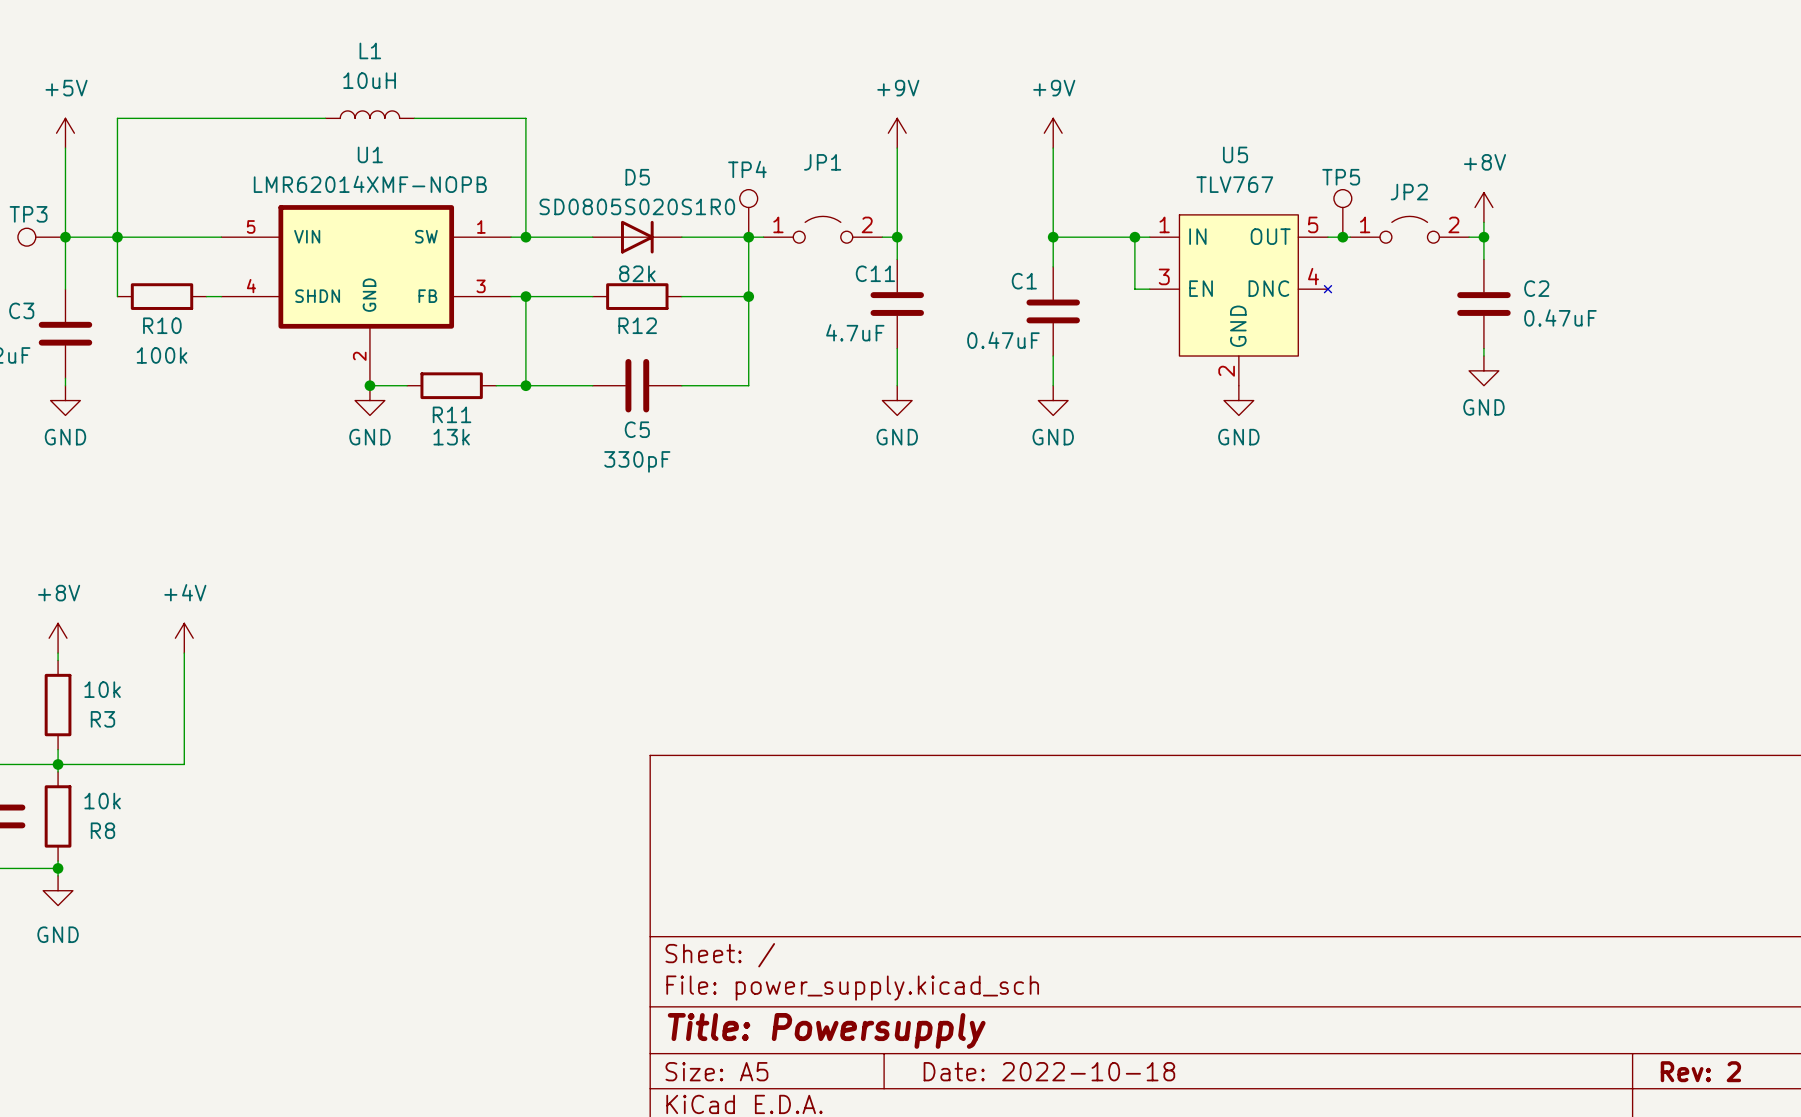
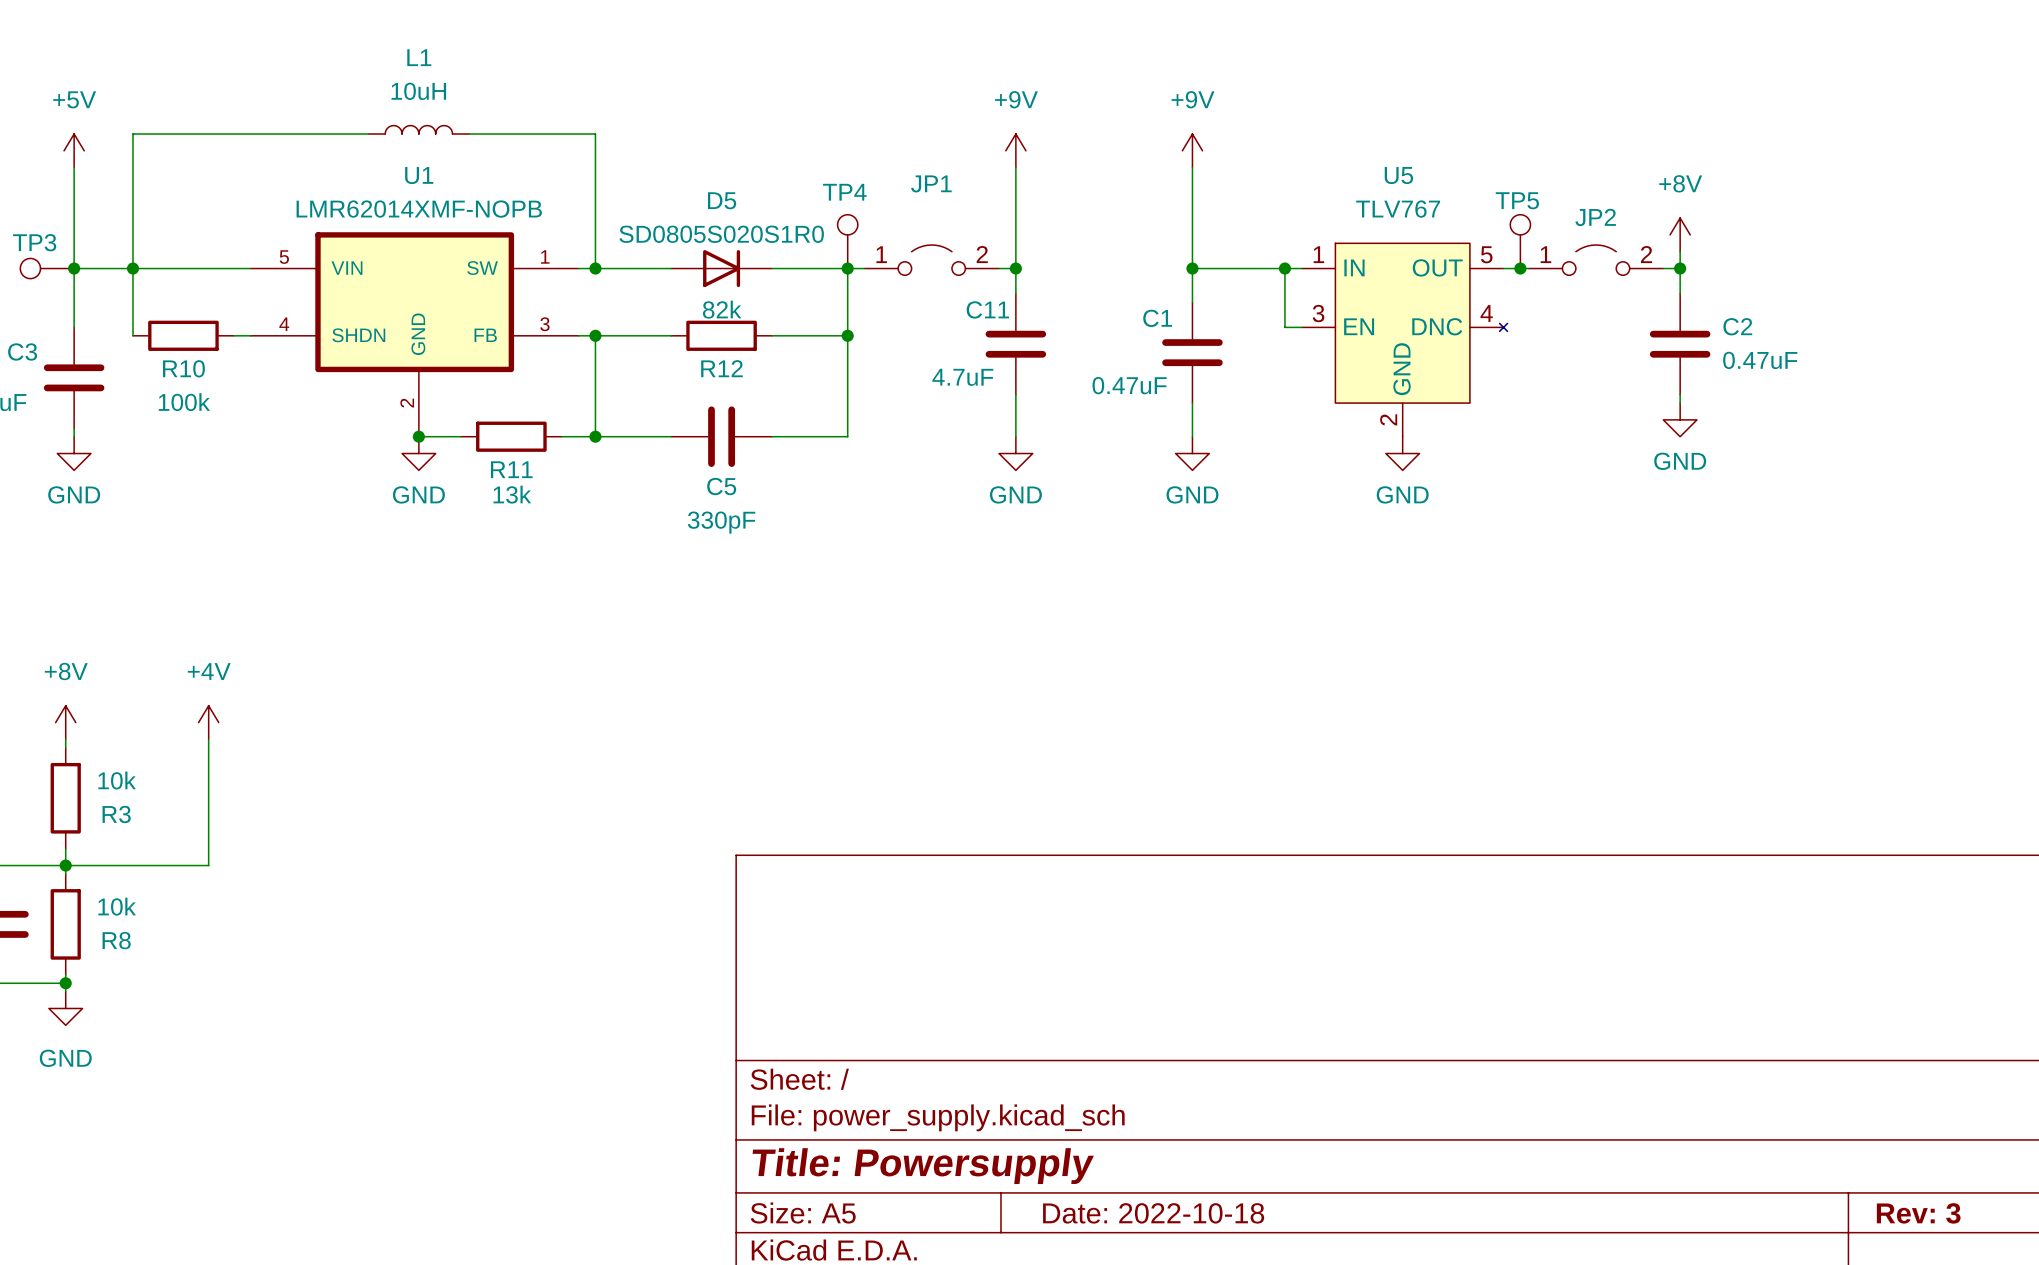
title block: Rev: 2 (1700, 1071) -> Rev: 3 (1918, 1213)

